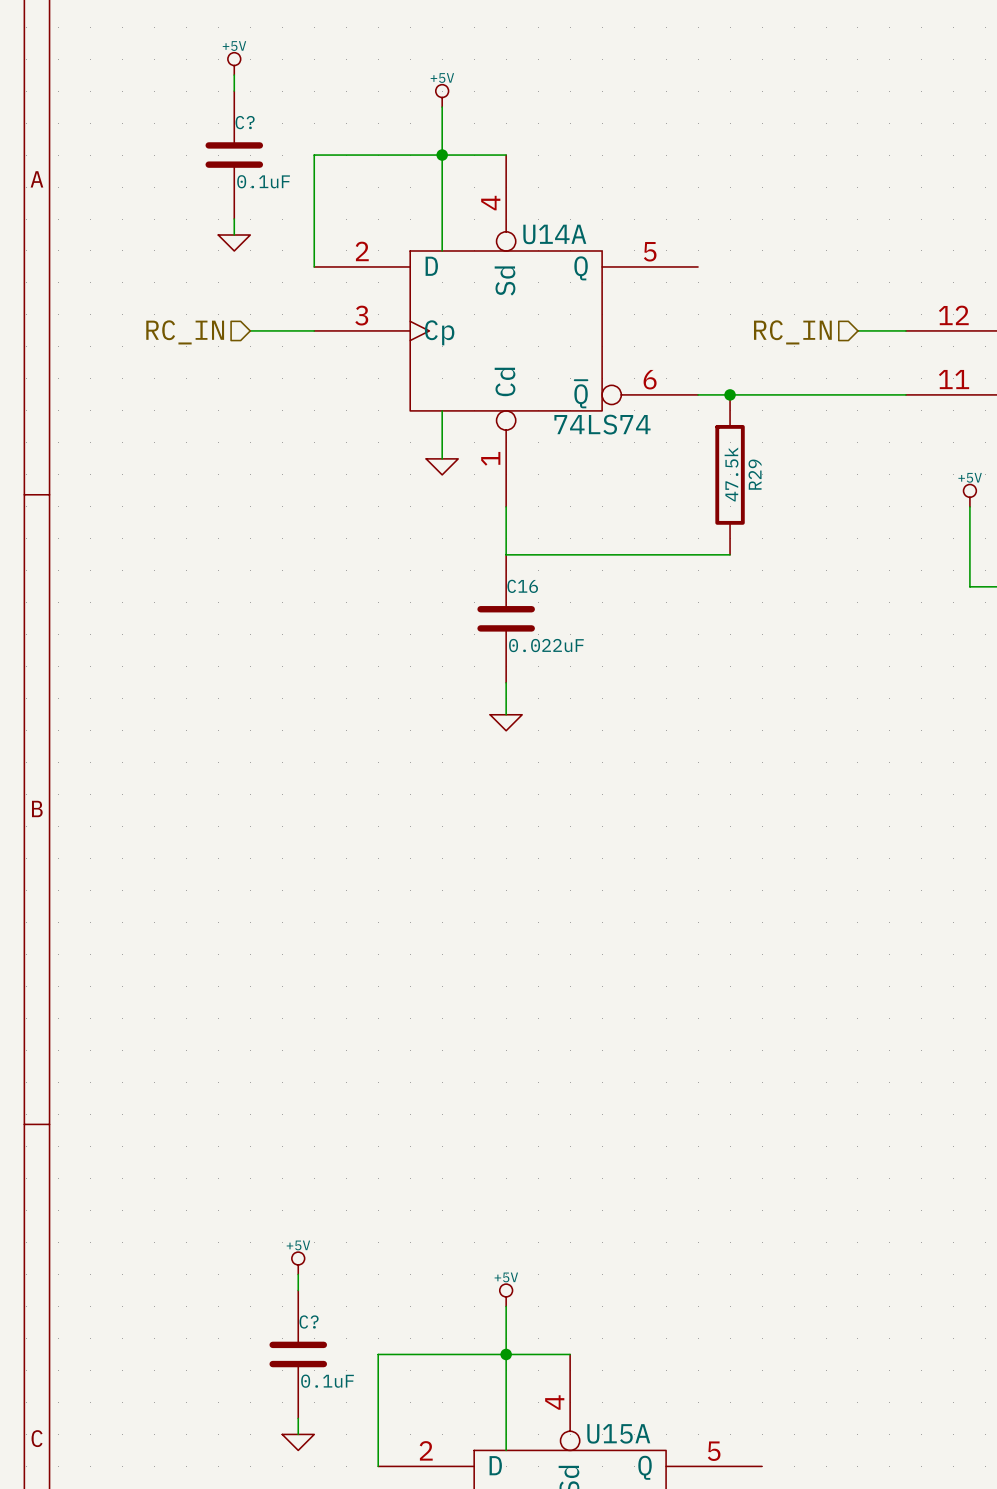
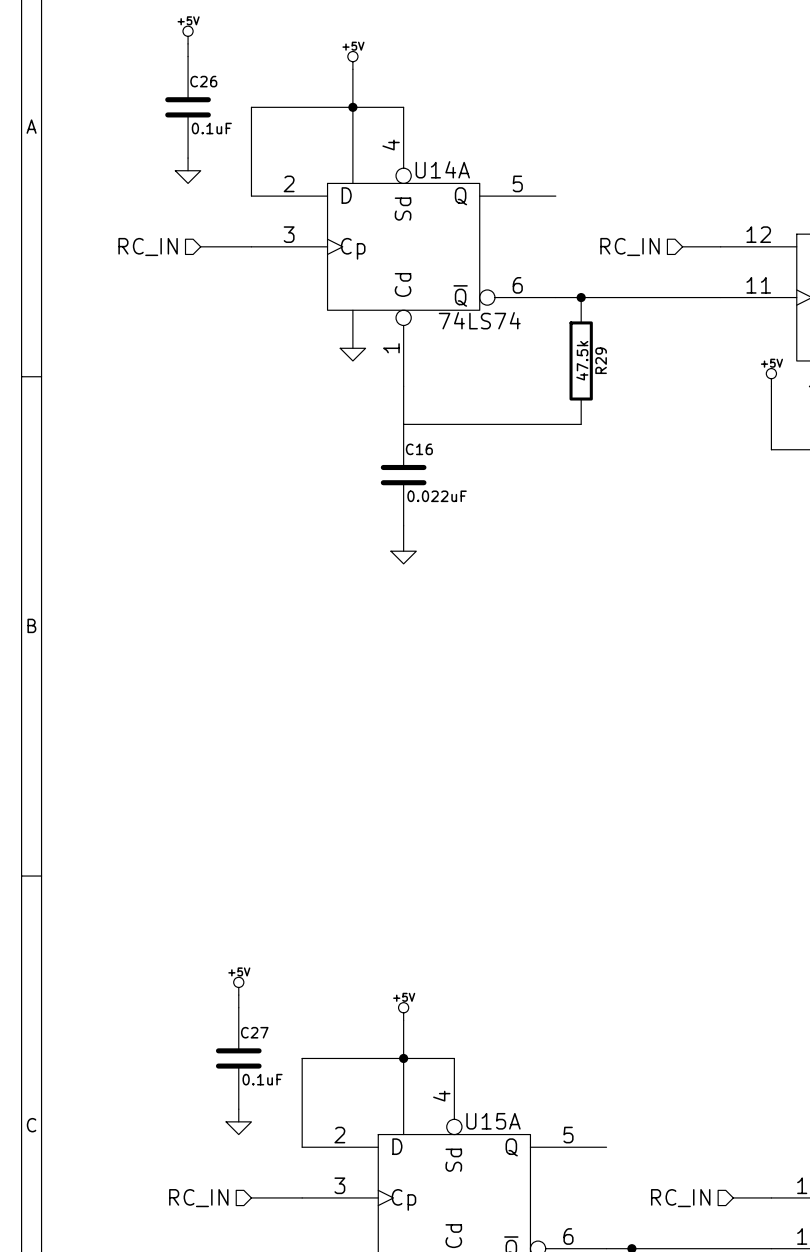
C? name: C? (245, 122) -> C26 (203, 81)
C? name: C? (309, 1322) -> C27 (254, 1032)

